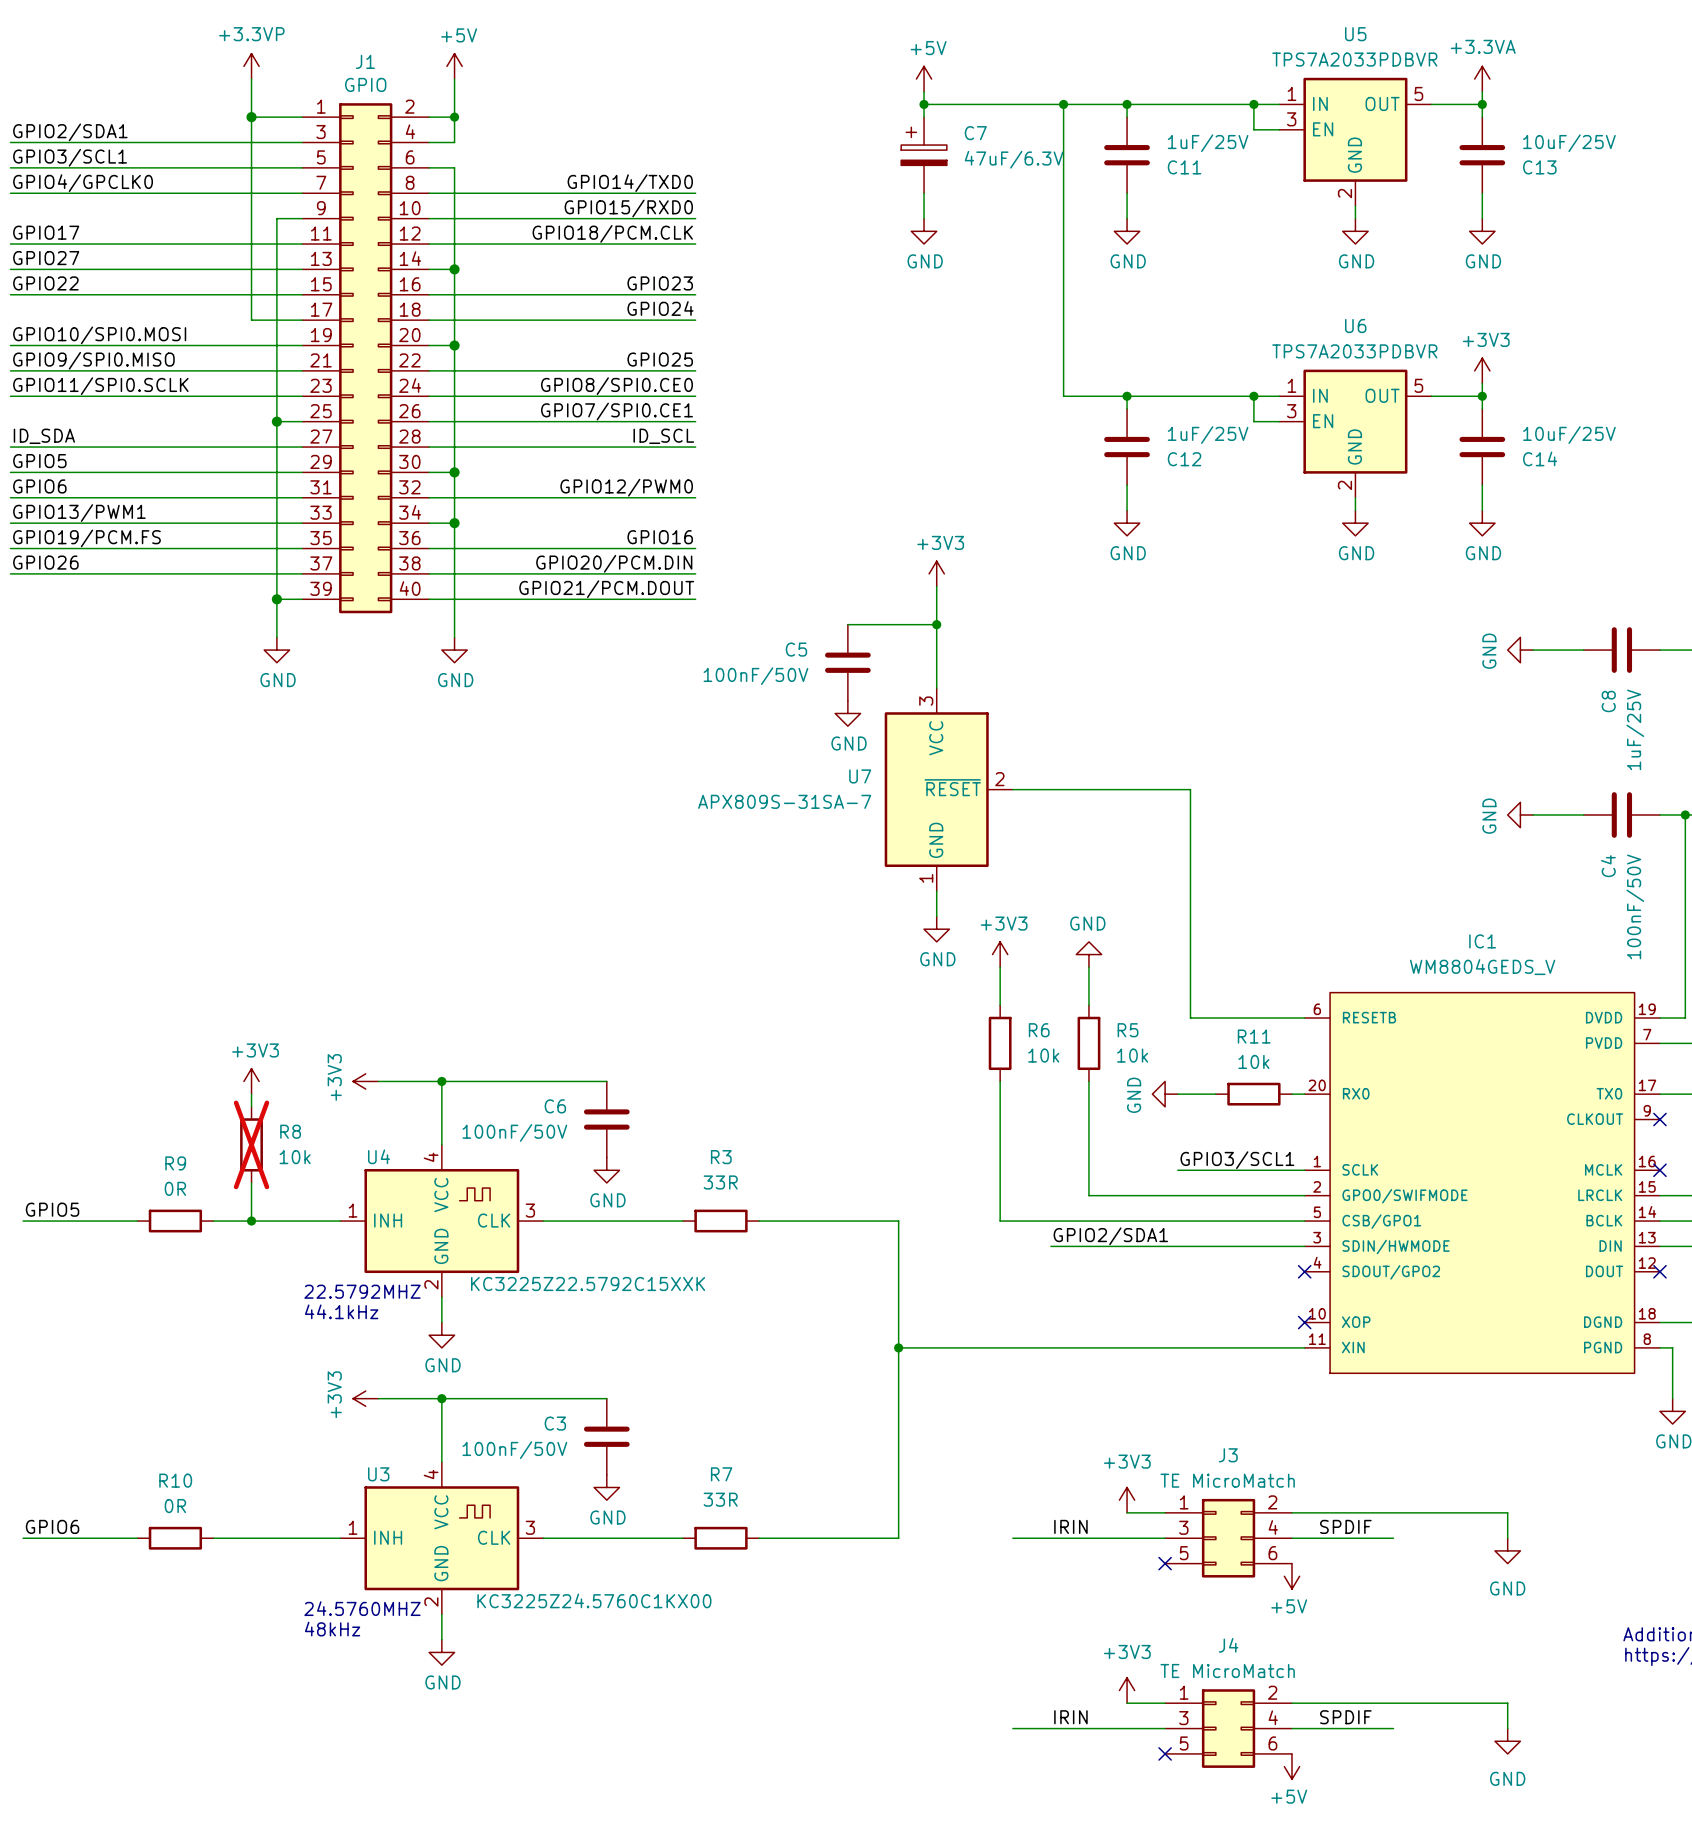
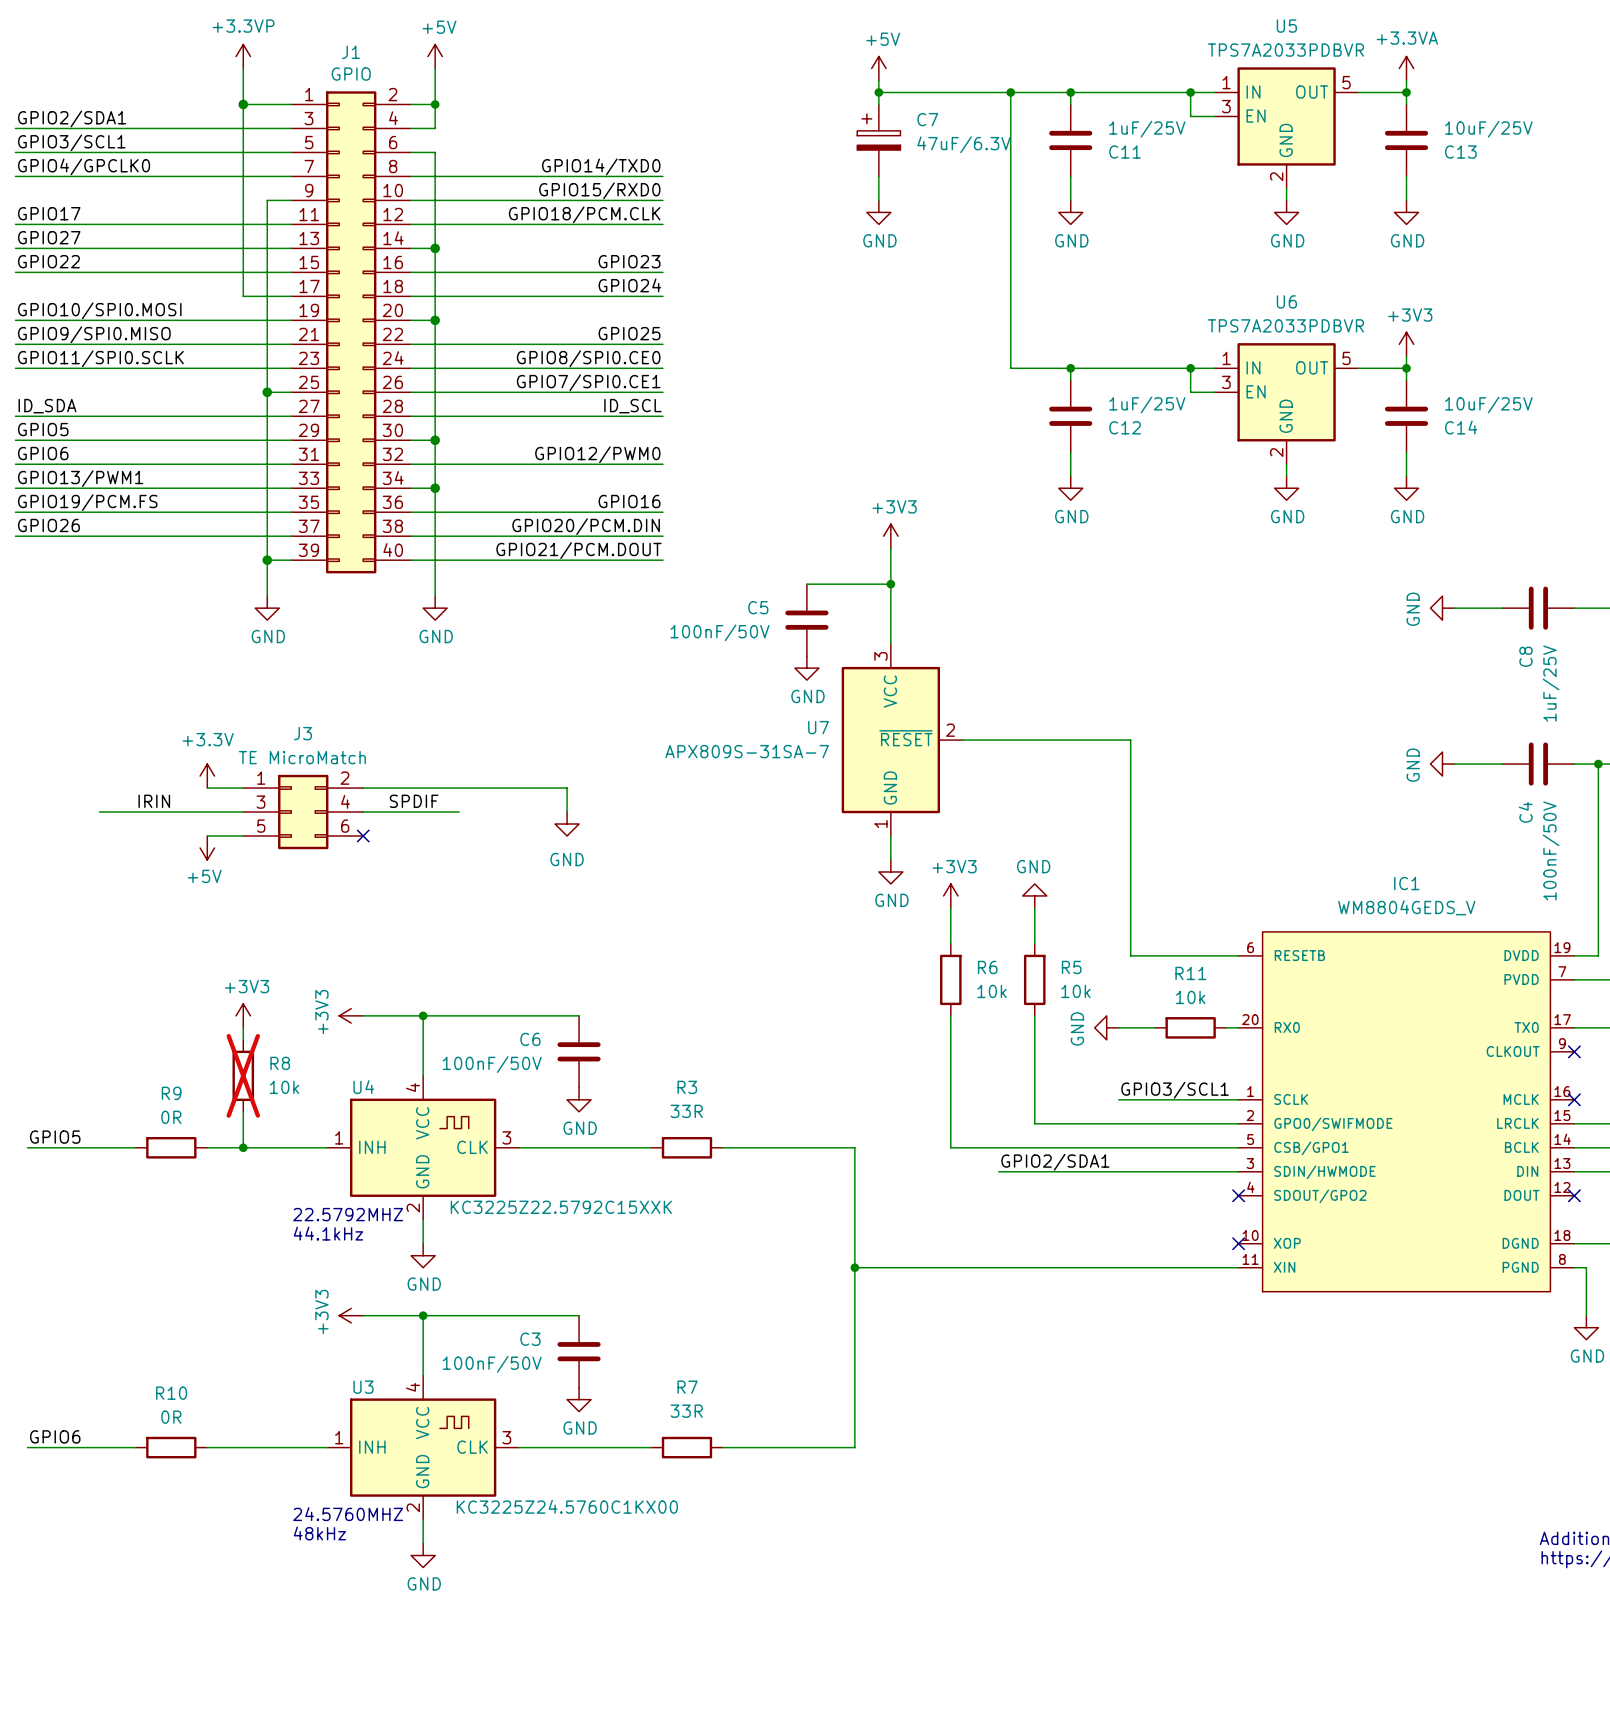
power symbol: none -> +3.3V (207, 776)
wire: none -> (207, 788) (243, 788)
wire: none -> (363, 788) (567, 788) (567, 812)
label: none -> IRIN (154, 801)
label: none -> SPDIF (414, 801)
wire: none -> (99, 812) (243, 812)
wire: none -> (363, 812) (459, 812)
power symbol: none -> GND (567, 824)
wire: none -> (207, 836) (243, 836)
no-connect mark: none -> (363, 836)
power symbol: none -> +5V (207, 847)
power symbol: +3V3 (1127, 1500) -> none
wire: (1127, 1512) (1165, 1512) -> none
wire: (1291, 1512) (1507, 1512) (1507, 1538) -> none
label: IRIN (1070, 1526) -> none
label: SPDIF (1345, 1526) -> none
wire: (1012, 1538) (1165, 1538) -> none
J3 position: (1228, 1538) -> (303, 812)
wire: (1291, 1538) (1393, 1538) -> none
power symbol: GND (1507, 1550) -> none
no-connect mark: (1165, 1563) -> none
power symbol: +5V (1291, 1576) -> none
power symbol: +3V3 (1127, 1690) -> none
wire: (1127, 1703) (1165, 1703) -> none
wire: (1291, 1703) (1507, 1703) (1507, 1728) -> none
label: IRIN (1070, 1717) -> none
label: SPDIF (1345, 1717) -> none
wire: (1012, 1728) (1165, 1728) -> none
J4: TE MicroMatch (1228, 1728) -> none
wire: (1291, 1728) (1393, 1728) -> none
power symbol: GND (1507, 1741) -> none
no-connect mark: (1165, 1753) -> none
power symbol: +5V (1291, 1766) -> none

